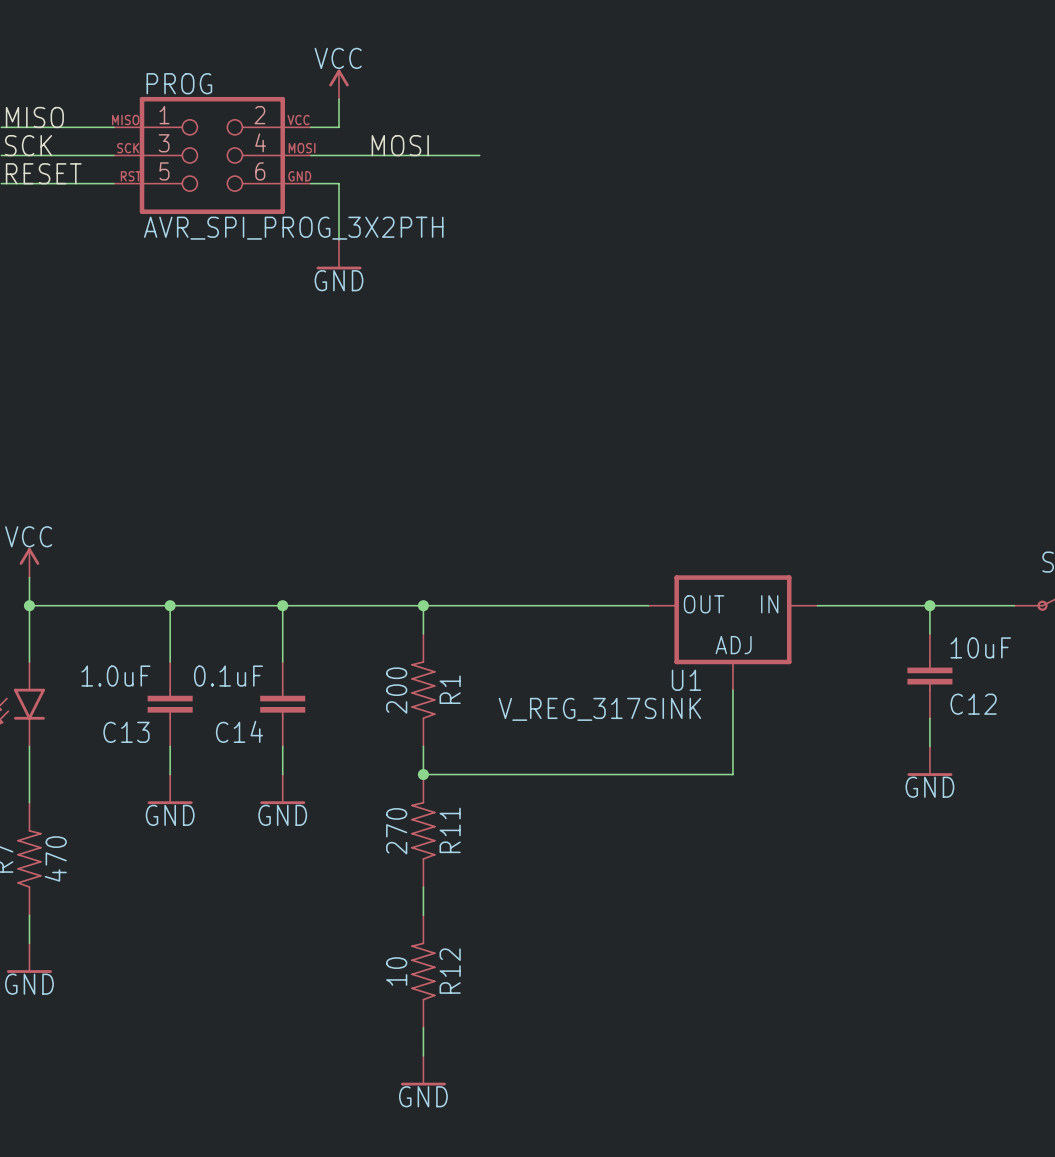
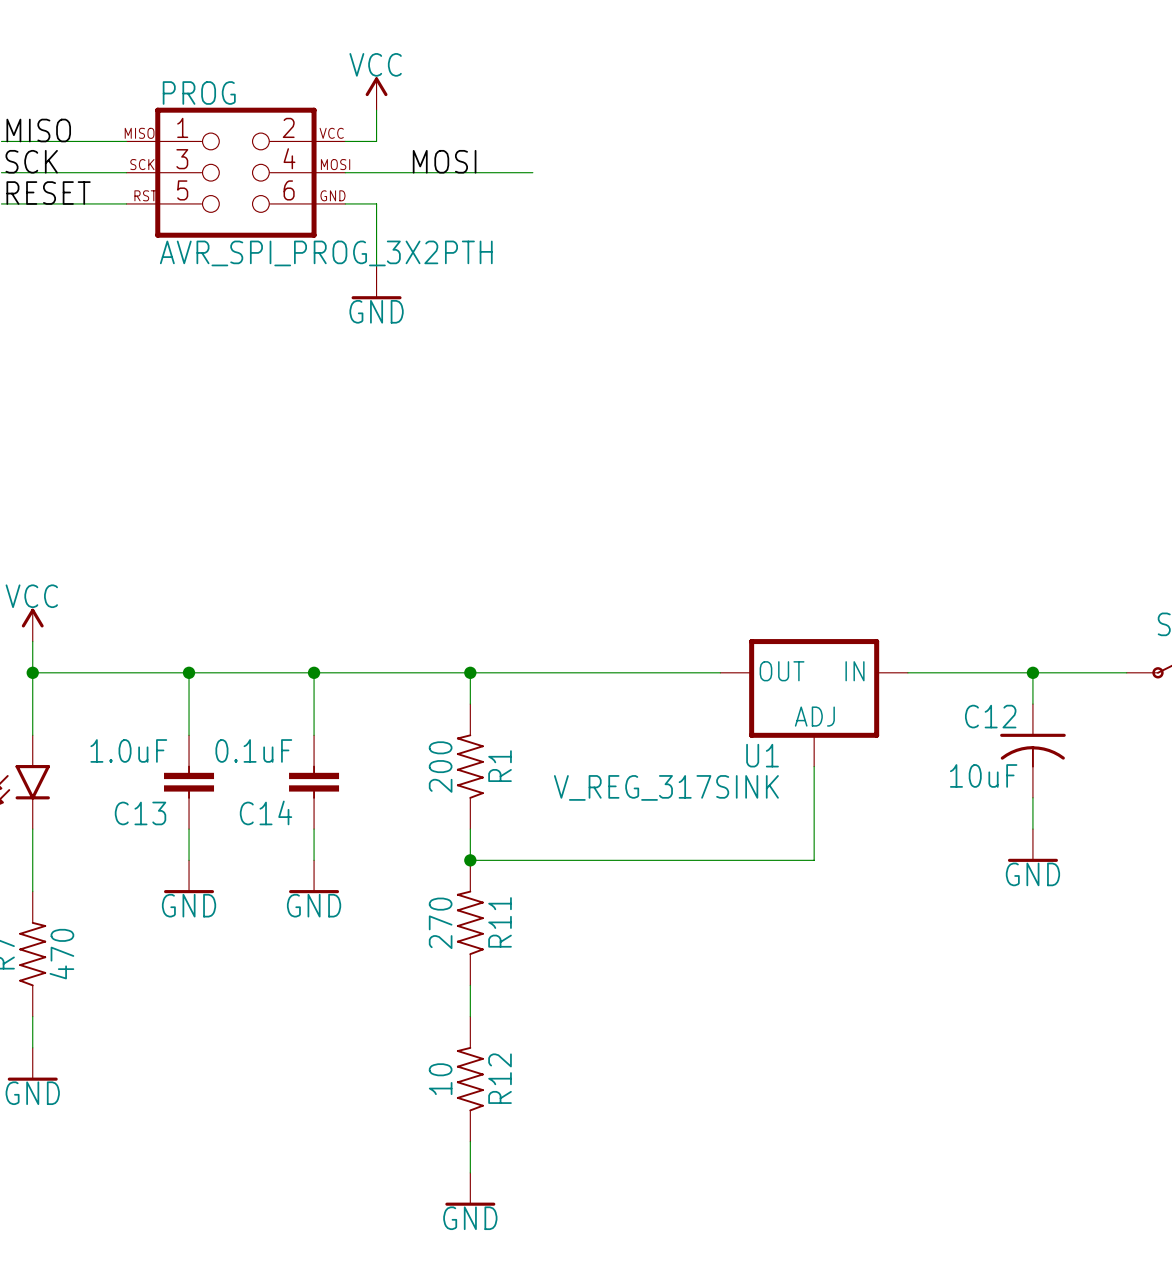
C12 symbol: [907, 633, 953, 719] -> [1000, 704, 1066, 798]
C12 value position: 10uF (980, 647) -> 10uF (983, 775)
C12 name position: C12 (973, 704) -> C12 (990, 716)

